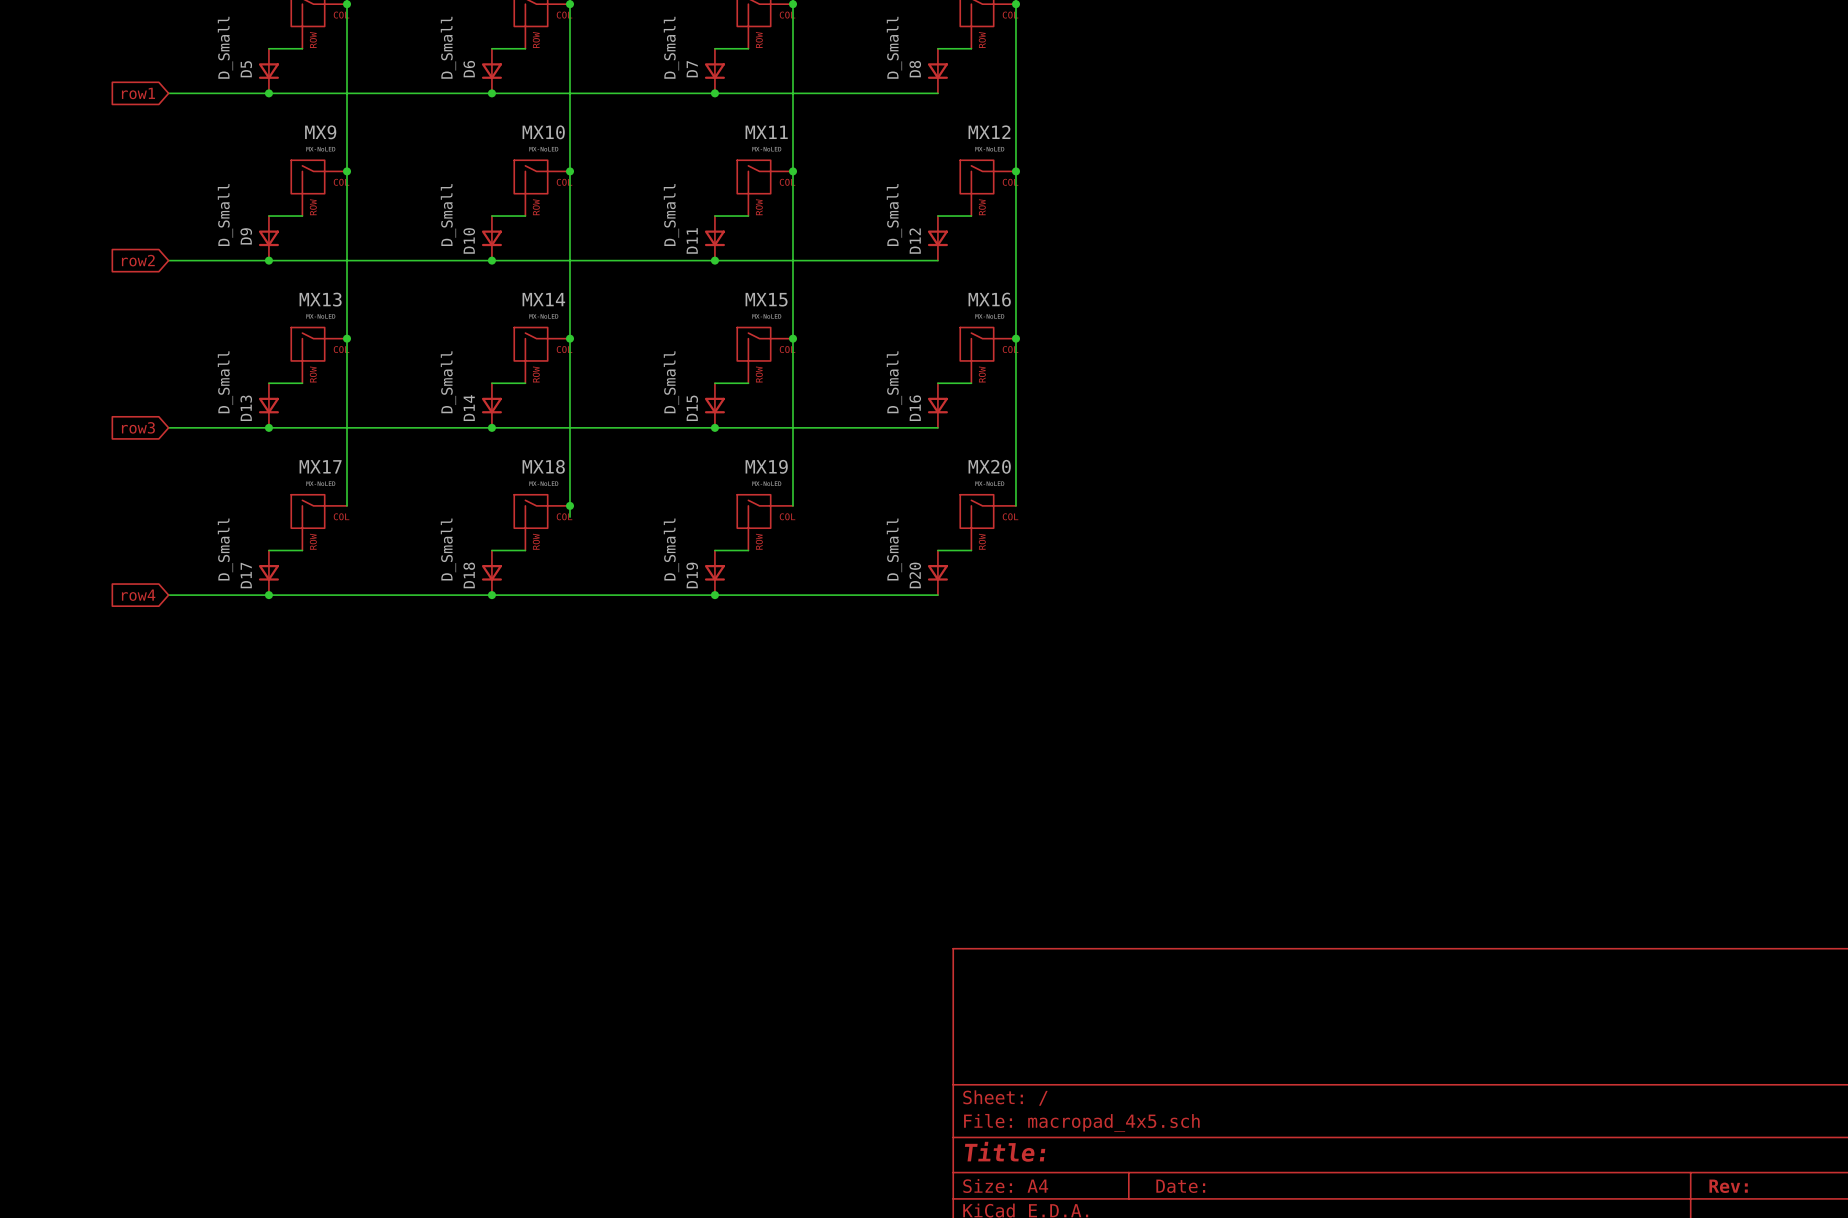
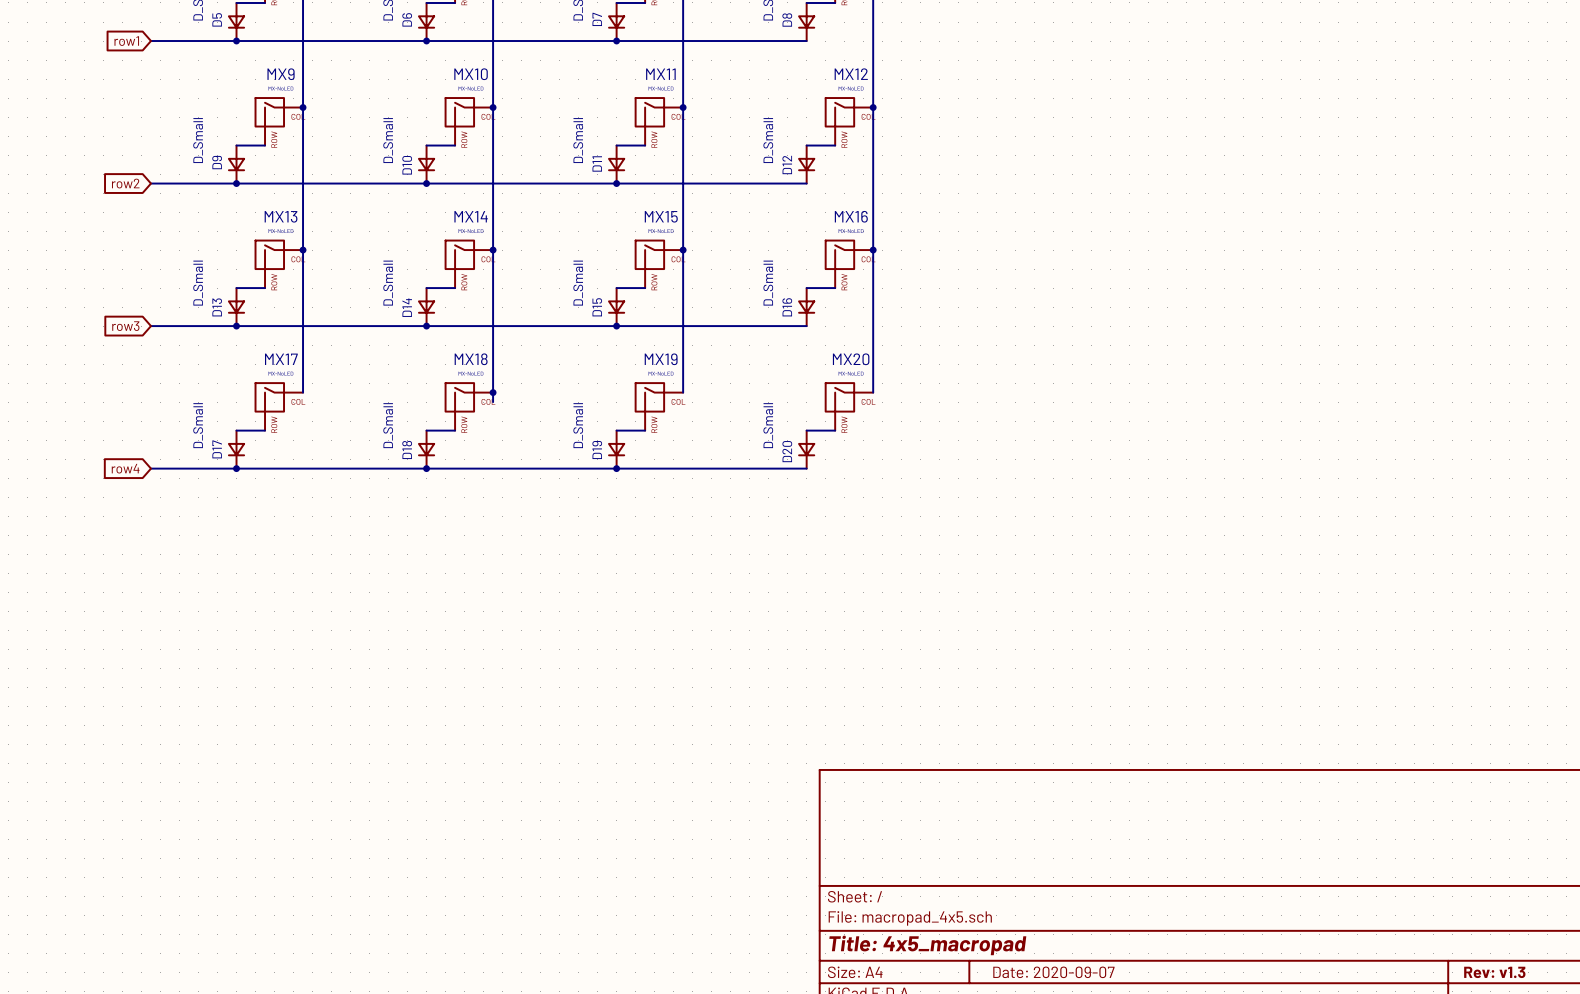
title block: Title: (1005, 1151) -> Title: 4x5_macropad (927, 945)
title block: Date: (1180, 1186) -> Date: 2020-09-07 (1053, 972)
title block: Rev: (1728, 1186) -> Rev: v1.3 (1494, 972)

